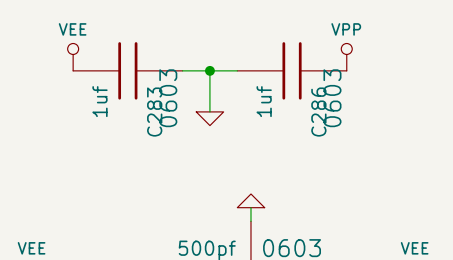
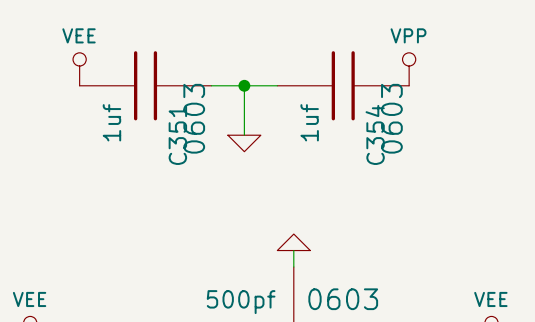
C283 name: C283 (154, 112) -> C351 (177, 135)
C286 name: C286 (318, 112) -> C354 (375, 134)

